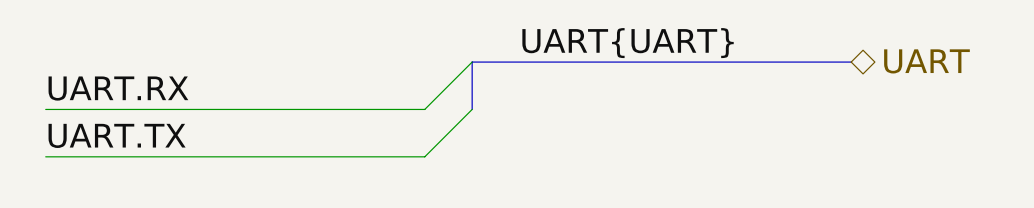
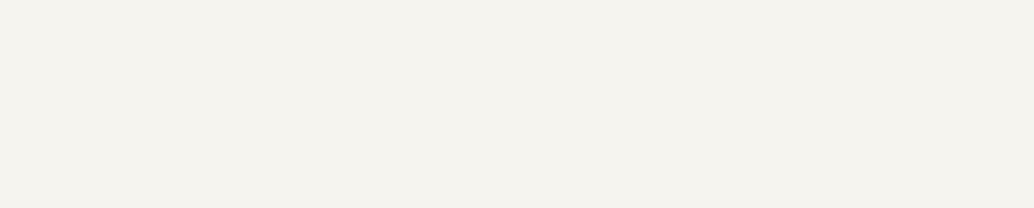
label: UART{UART} (628, 43) -> none
hierarchical label: UART (926, 61) -> none
wire: (472, 62) (424, 109) (45, 109) -> none
bus: (851, 62) (472, 62) (472, 109) -> none
label: UART.RX (118, 88) -> none
wire: (472, 109) (424, 156) (45, 156) -> none
label: UART.TX (117, 135) -> none

